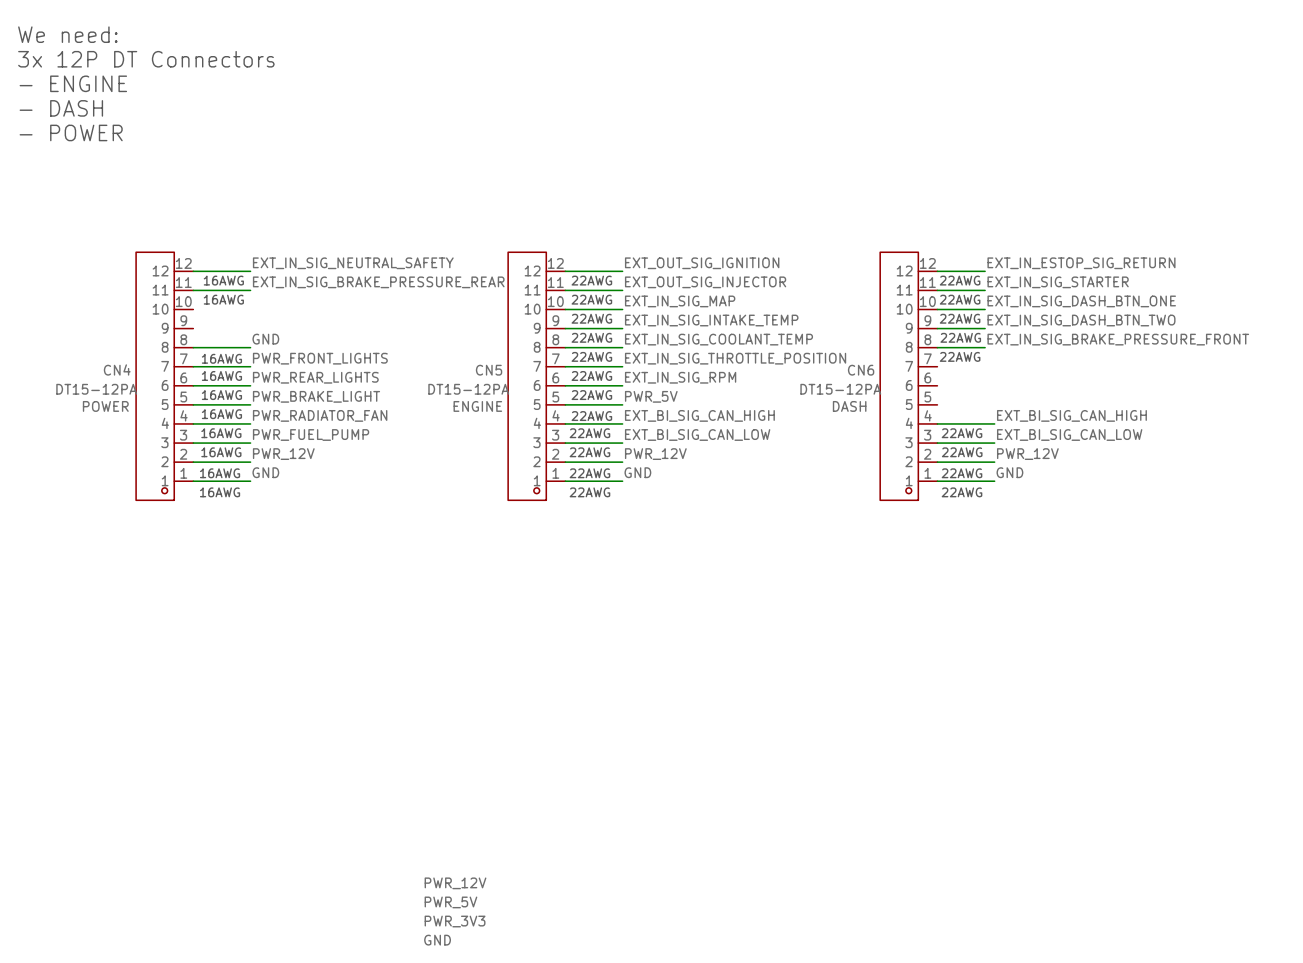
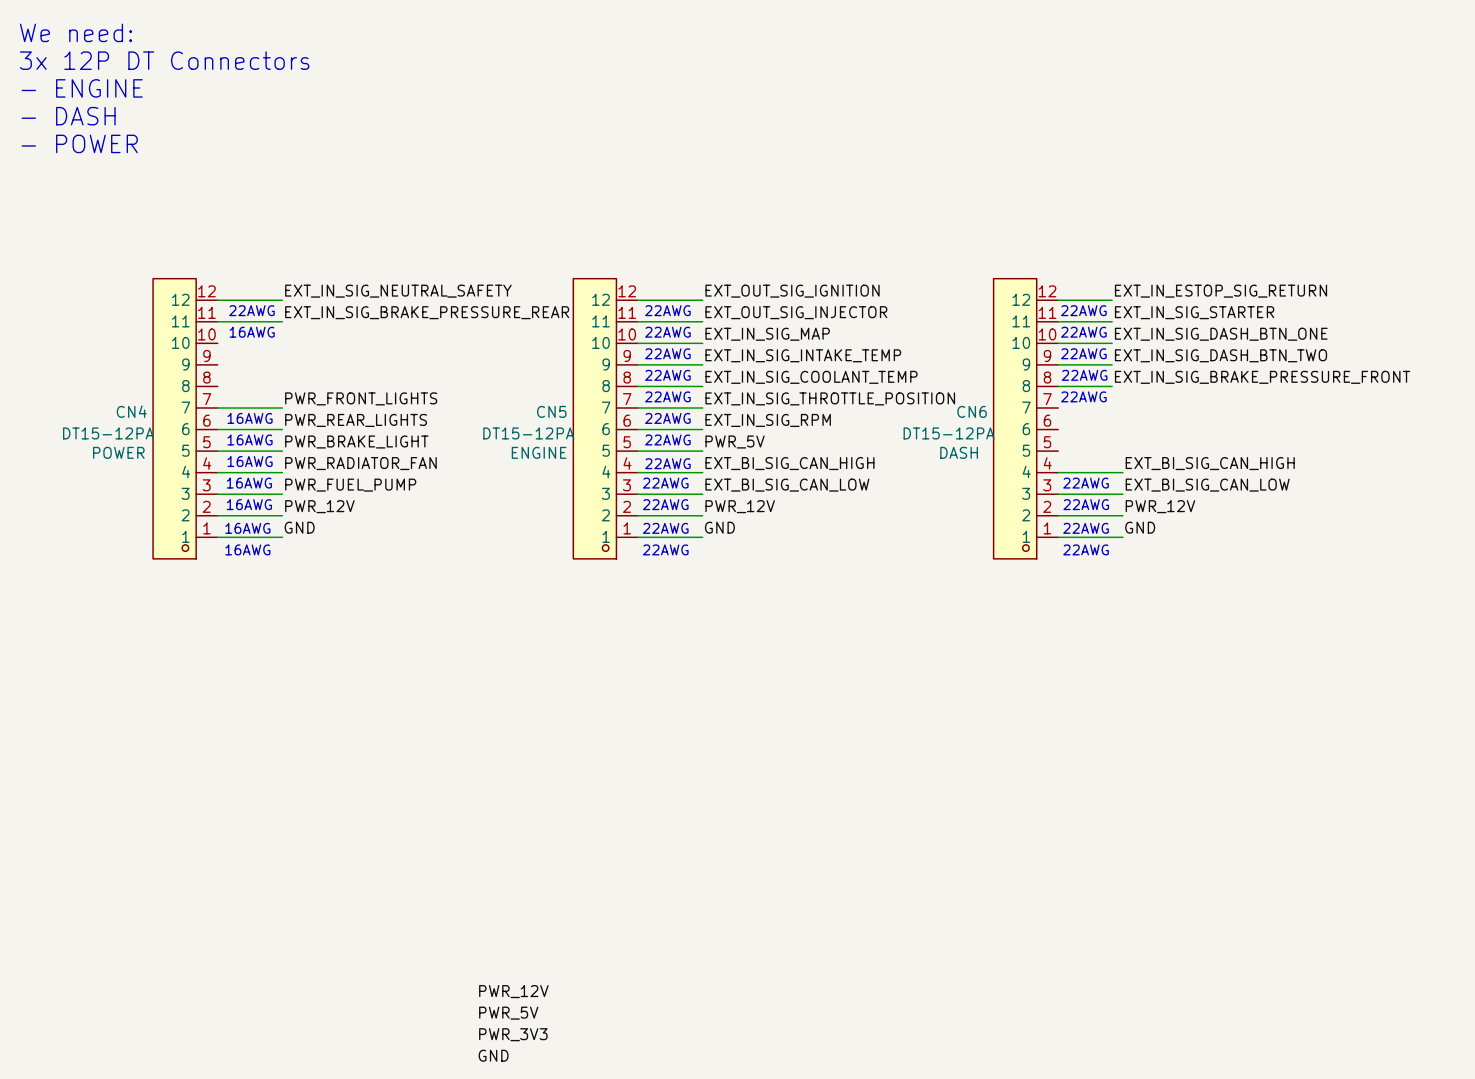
text: 16AWG (223, 280) -> 22AWG (251, 310)
label: GND (265, 339) -> none
wire: (193, 347) (250, 347) -> none
text: 16AWG (221, 358) -> none

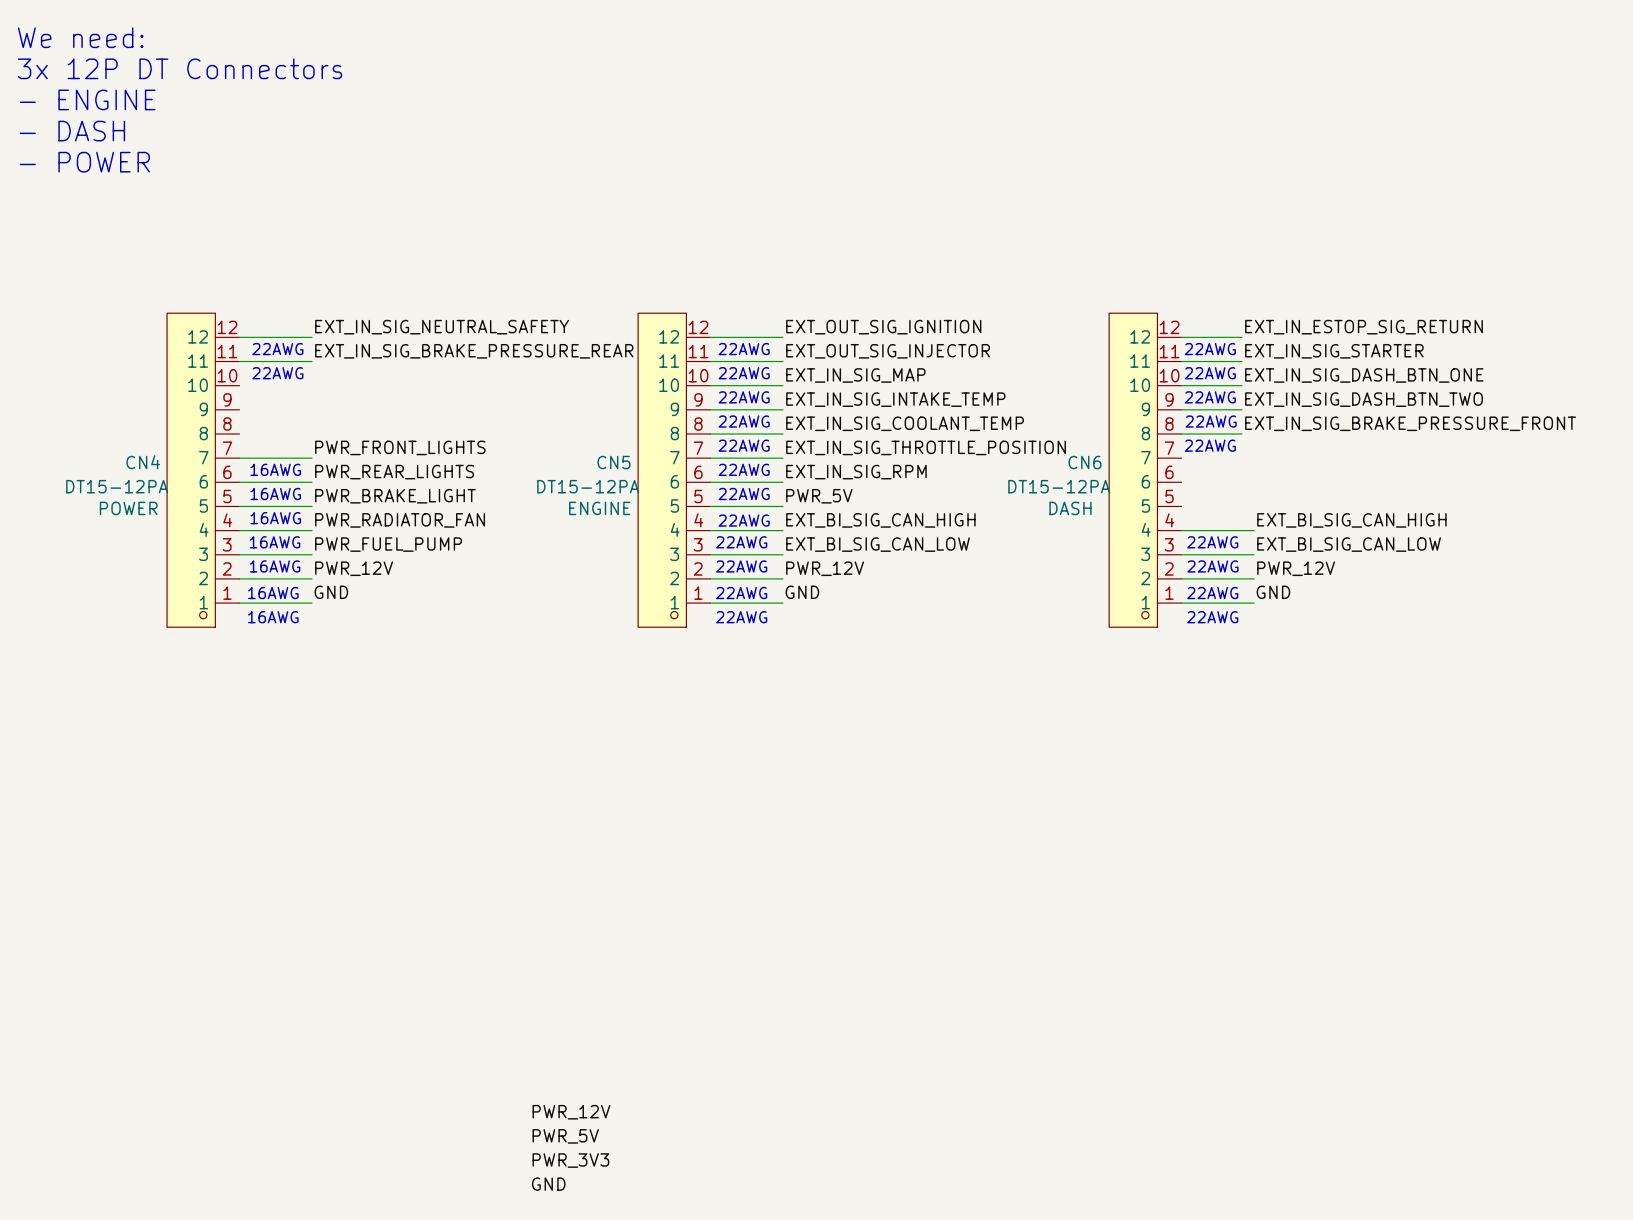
text: 16AWG (252, 332) -> 22AWG (277, 373)

